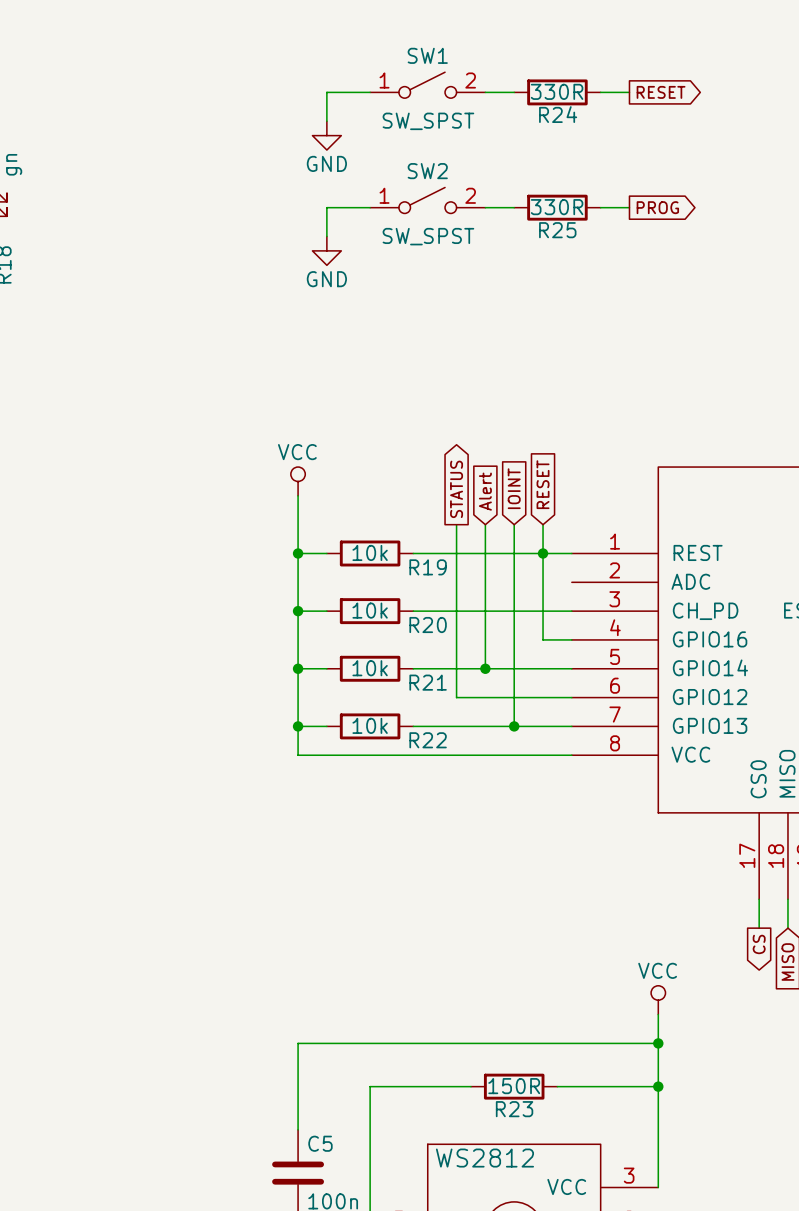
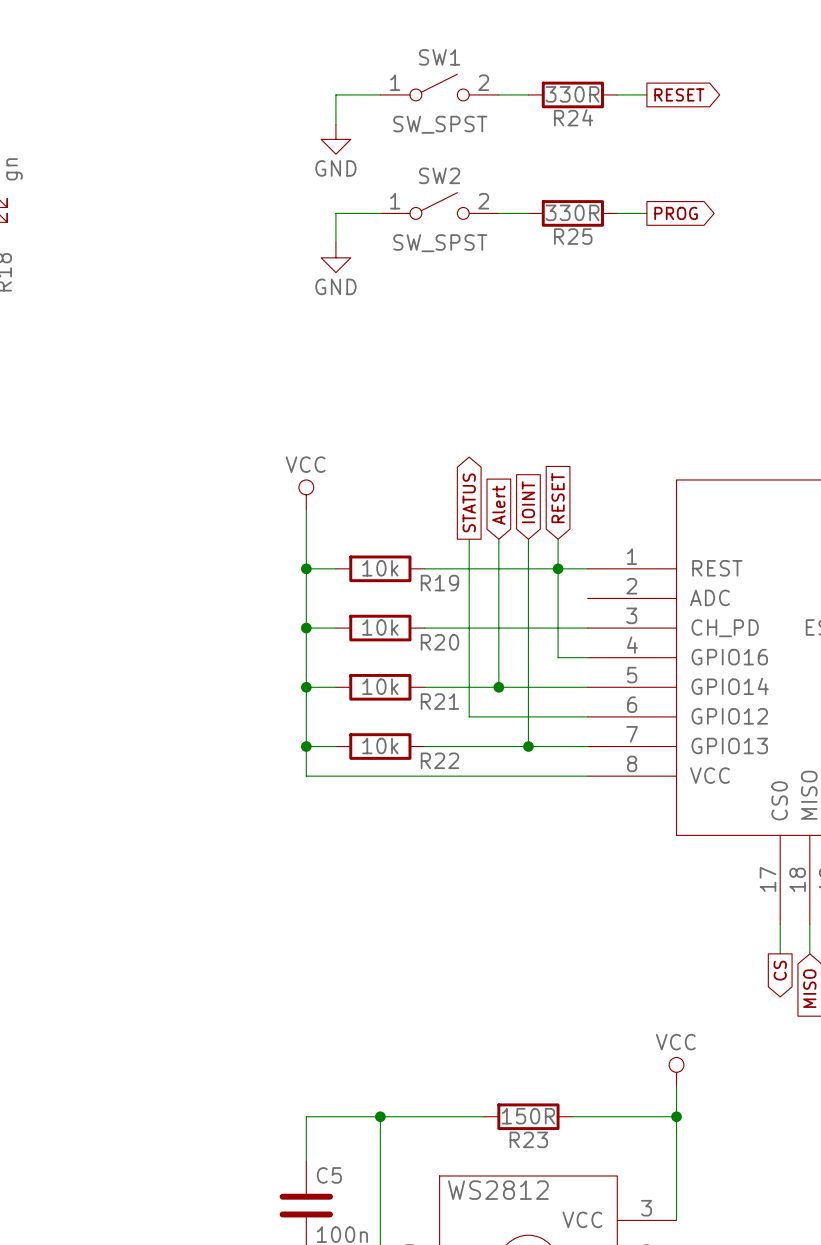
power symbol position: VCC (658, 1000) -> VCC (676, 1072)
wire: (658, 1014) (658, 1057) -> none
wire: (658, 1043) (298, 1043) (298, 1086) -> (380, 1116) (306, 1116)
junction: (658, 1043) -> none
junction: none -> (380, 1116)

